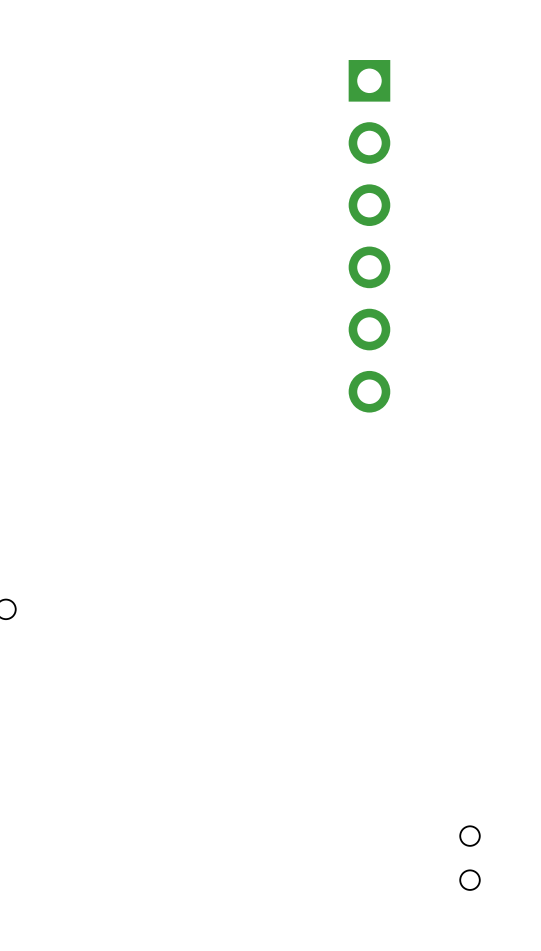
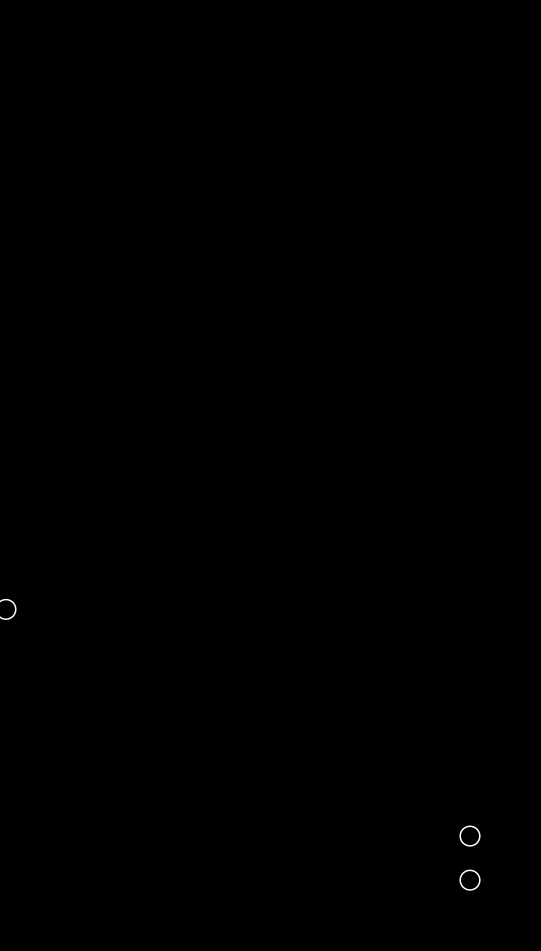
part: (369, 236) -> none

